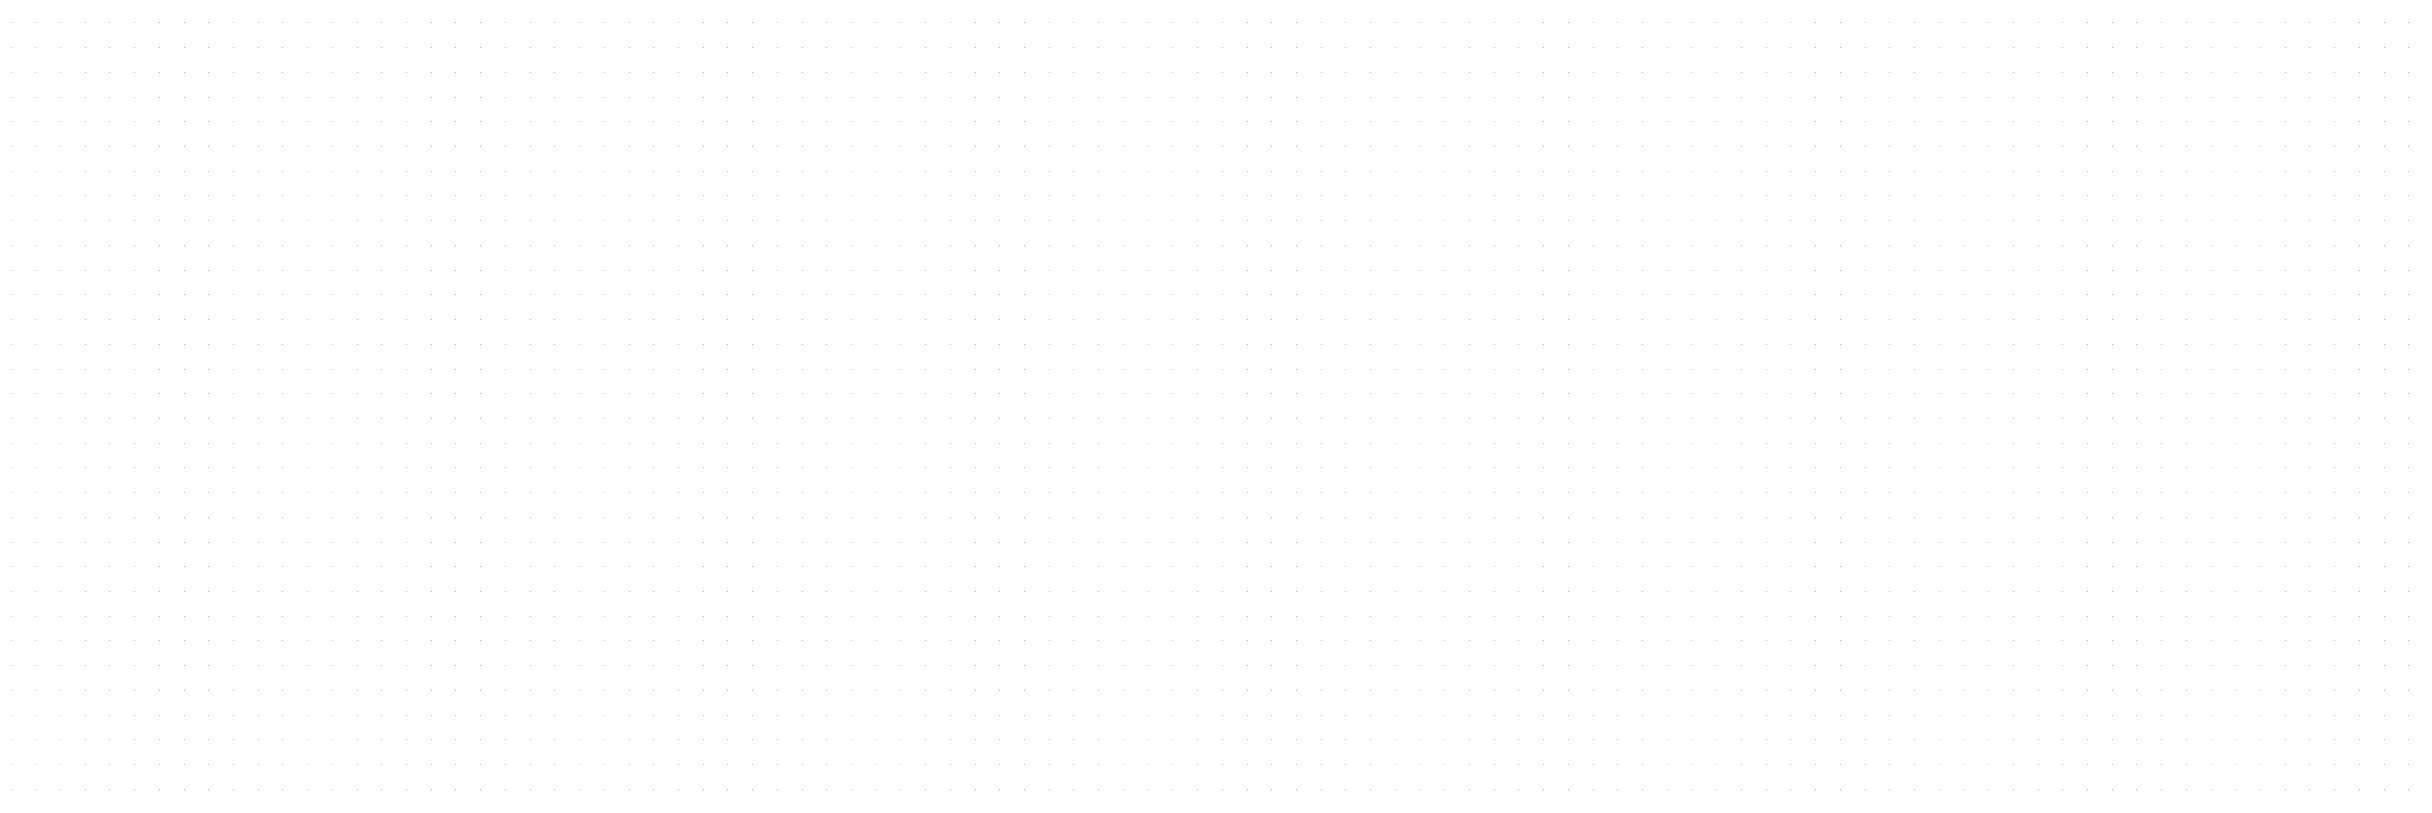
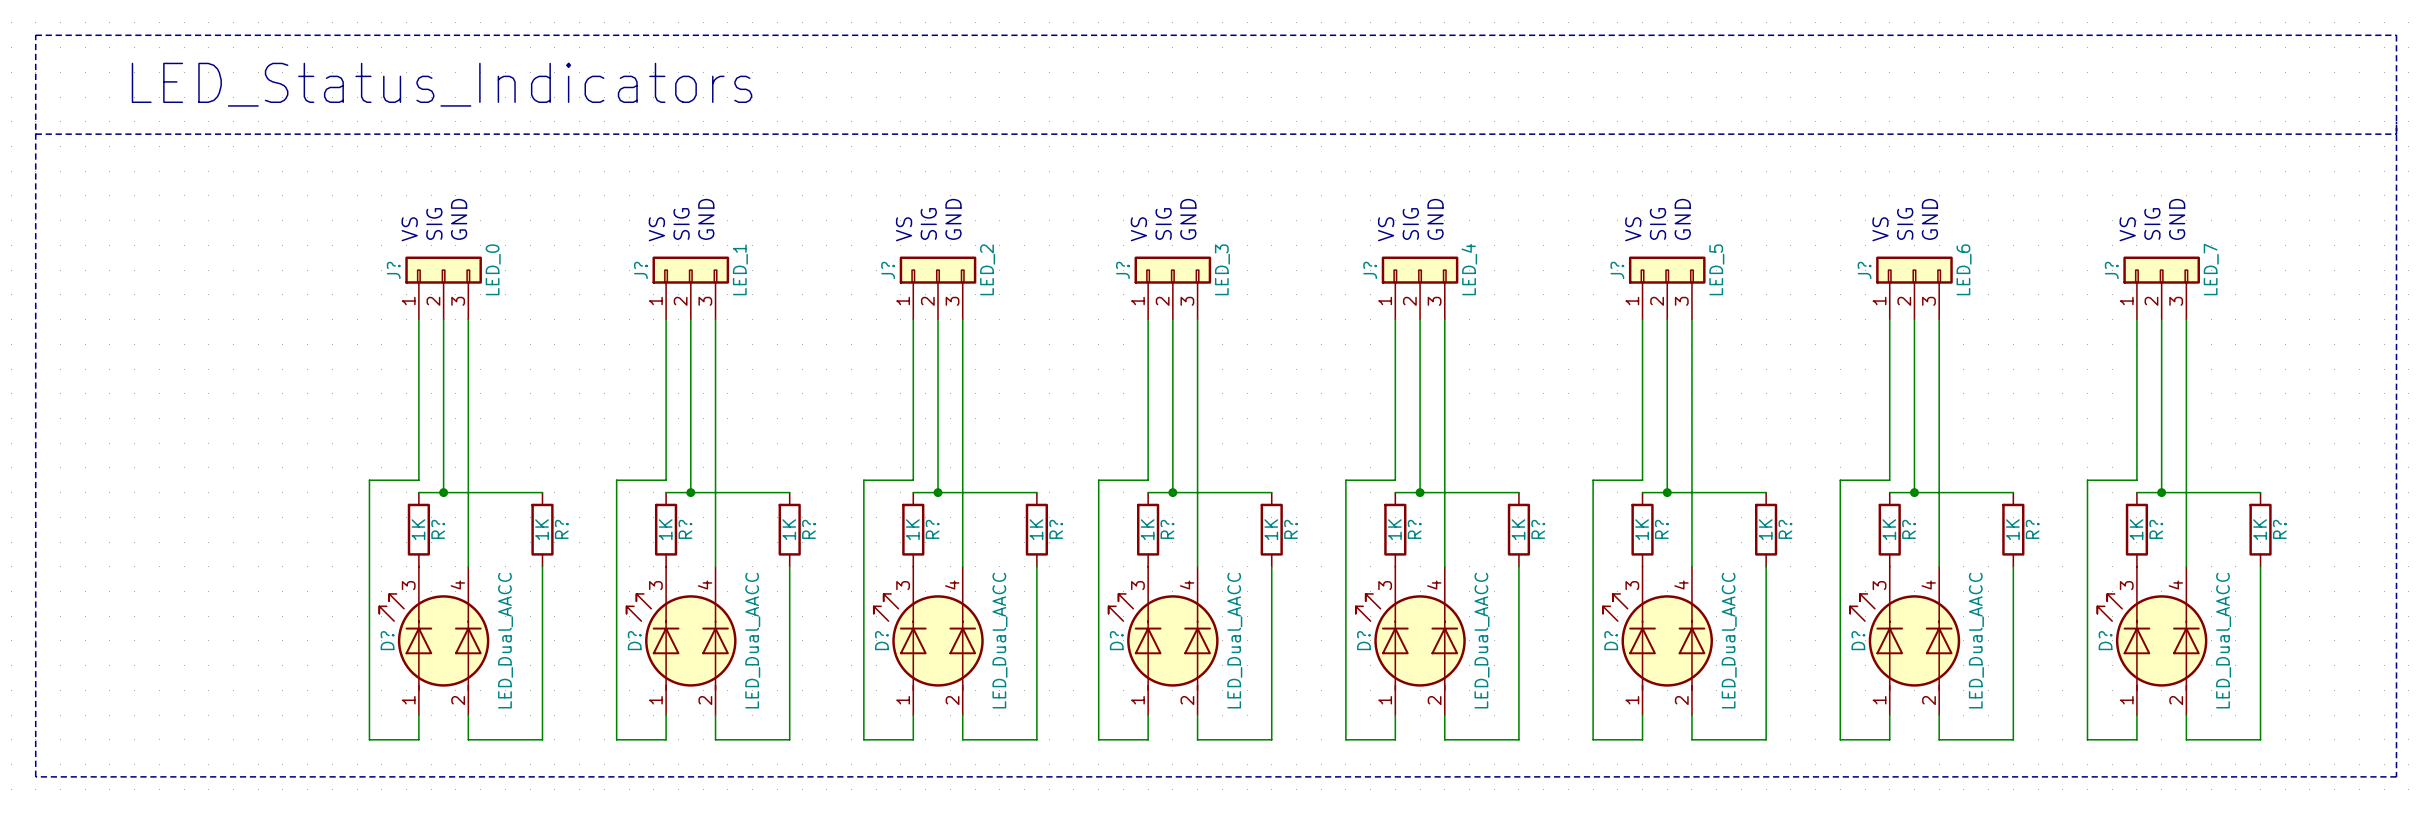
line: none -> (35, 35) (2396, 35) (2396, 776) (35, 776) (35, 35)
text: none -> LED_Status_Indicators (442, 84)
line: none -> (35, 134) (2396, 134)
text: none -> GND (459, 219)
text: none -> GND (706, 219)
text: none -> GND (953, 219)
text: none -> GND (1188, 219)
text: none -> GND (1435, 219)
text: none -> GND (1682, 219)
text: none -> GND (1929, 219)
text: none -> GND (2177, 219)
text: none -> SIG (434, 223)
text: none -> SIG (681, 223)
text: none -> SIG (928, 223)
text: none -> SIG (1163, 223)
text: none -> SIG (1410, 223)
text: none -> SIG (1658, 223)
text: none -> SIG (1905, 223)
text: none -> SIG (2152, 223)
text: none -> VS (409, 229)
text: none -> VS (656, 229)
text: none -> VS (904, 229)
text: none -> VS (1138, 229)
text: none -> VS (1386, 229)
text: none -> VS (1633, 229)
text: none -> VS (1880, 229)
text: none -> VS (2127, 229)
J?: none -> LED_0 (443, 288)
J?: none -> LED_1 (690, 288)
J?: none -> LED_2 (938, 288)
J?: none -> LED_3 (1172, 288)
J?: none -> LED_4 (1420, 288)
J?: none -> LED_5 (1667, 288)
J?: none -> LED_6 (1914, 288)
J?: none -> LED_7 (2161, 288)
wire: none -> (418, 319) (418, 480) (369, 480) (369, 739) (418, 739) (418, 715)
wire: none -> (443, 319) (443, 492)
wire: none -> (468, 319) (468, 566)
wire: none -> (666, 319) (666, 480) (616, 480) (616, 739) (666, 739) (666, 715)
wire: none -> (690, 319) (690, 492)
wire: none -> (715, 319) (715, 566)
wire: none -> (913, 319) (913, 480) (863, 480) (863, 739) (913, 739) (913, 715)
wire: none -> (938, 319) (938, 492)
wire: none -> (962, 319) (962, 566)
wire: none -> (1148, 319) (1148, 480) (1098, 480) (1098, 739) (1148, 739) (1148, 715)
wire: none -> (1172, 319) (1172, 492)
wire: none -> (1197, 319) (1197, 566)
wire: none -> (1395, 319) (1395, 480) (1345, 480) (1345, 739) (1395, 739) (1395, 715)
wire: none -> (1420, 319) (1420, 492)
wire: none -> (1444, 319) (1444, 566)
wire: none -> (1642, 319) (1642, 480) (1593, 480) (1593, 739) (1642, 739) (1642, 715)
wire: none -> (1667, 319) (1667, 492)
wire: none -> (1691, 319) (1691, 566)
wire: none -> (1889, 319) (1889, 480) (1840, 480) (1840, 739) (1889, 739) (1889, 715)
wire: none -> (1914, 319) (1914, 492)
wire: none -> (1939, 319) (1939, 566)
wire: none -> (2136, 319) (2136, 480) (2087, 480) (2087, 739) (2136, 739) (2136, 715)
wire: none -> (2161, 319) (2161, 492)
wire: none -> (2186, 319) (2186, 566)
wire: none -> (418, 492) (542, 492)
junction: none -> (443, 492)
wire: none -> (666, 492) (789, 492)
junction: none -> (690, 492)
wire: none -> (913, 492) (1036, 492)
junction: none -> (938, 492)
wire: none -> (1148, 492) (1271, 492)
junction: none -> (1172, 492)
wire: none -> (1395, 492) (1518, 492)
junction: none -> (1420, 492)
wire: none -> (1642, 492) (1766, 492)
junction: none -> (1667, 492)
wire: none -> (1889, 492) (2013, 492)
junction: none -> (1914, 492)
wire: none -> (2136, 492) (2260, 492)
junction: none -> (2161, 492)
R?: none -> 1K (418, 529)
R?: none -> 1K (542, 529)
R?: none -> 1K (666, 529)
R?: none -> 1K (789, 529)
R?: none -> 1K (913, 529)
R?: none -> 1K (1036, 529)
R?: none -> 1K (1148, 529)
R?: none -> 1K (1271, 529)
R?: none -> 1K (1395, 529)
R?: none -> 1K (1518, 529)
R?: none -> 1K (1642, 529)
R?: none -> 1K (1766, 529)
R?: none -> 1K (1889, 529)
R?: none -> 1K (2013, 529)
R?: none -> 1K (2136, 529)
R?: none -> 1K (2260, 529)
wire: none -> (542, 566) (542, 739) (468, 739) (468, 715)
wire: none -> (789, 566) (789, 739) (715, 739) (715, 715)
wire: none -> (1036, 566) (1036, 739) (962, 739) (962, 715)
wire: none -> (1271, 566) (1271, 739) (1197, 739) (1197, 715)
wire: none -> (1518, 566) (1518, 739) (1444, 739) (1444, 715)
wire: none -> (1766, 566) (1766, 739) (1691, 739) (1691, 715)
wire: none -> (2013, 566) (2013, 739) (1939, 739) (1939, 715)
wire: none -> (2260, 566) (2260, 739) (2186, 739) (2186, 715)
D?: none -> LED_Dual_AACC (434, 640)
D?: none -> LED_Dual_AACC (681, 640)
D?: none -> LED_Dual_AACC (928, 640)
D?: none -> LED_Dual_AACC (1163, 640)
D?: none -> LED_Dual_AACC (1410, 640)
D?: none -> LED_Dual_AACC (1657, 640)
D?: none -> LED_Dual_AACC (1905, 640)
D?: none -> LED_Dual_AACC (2152, 640)

